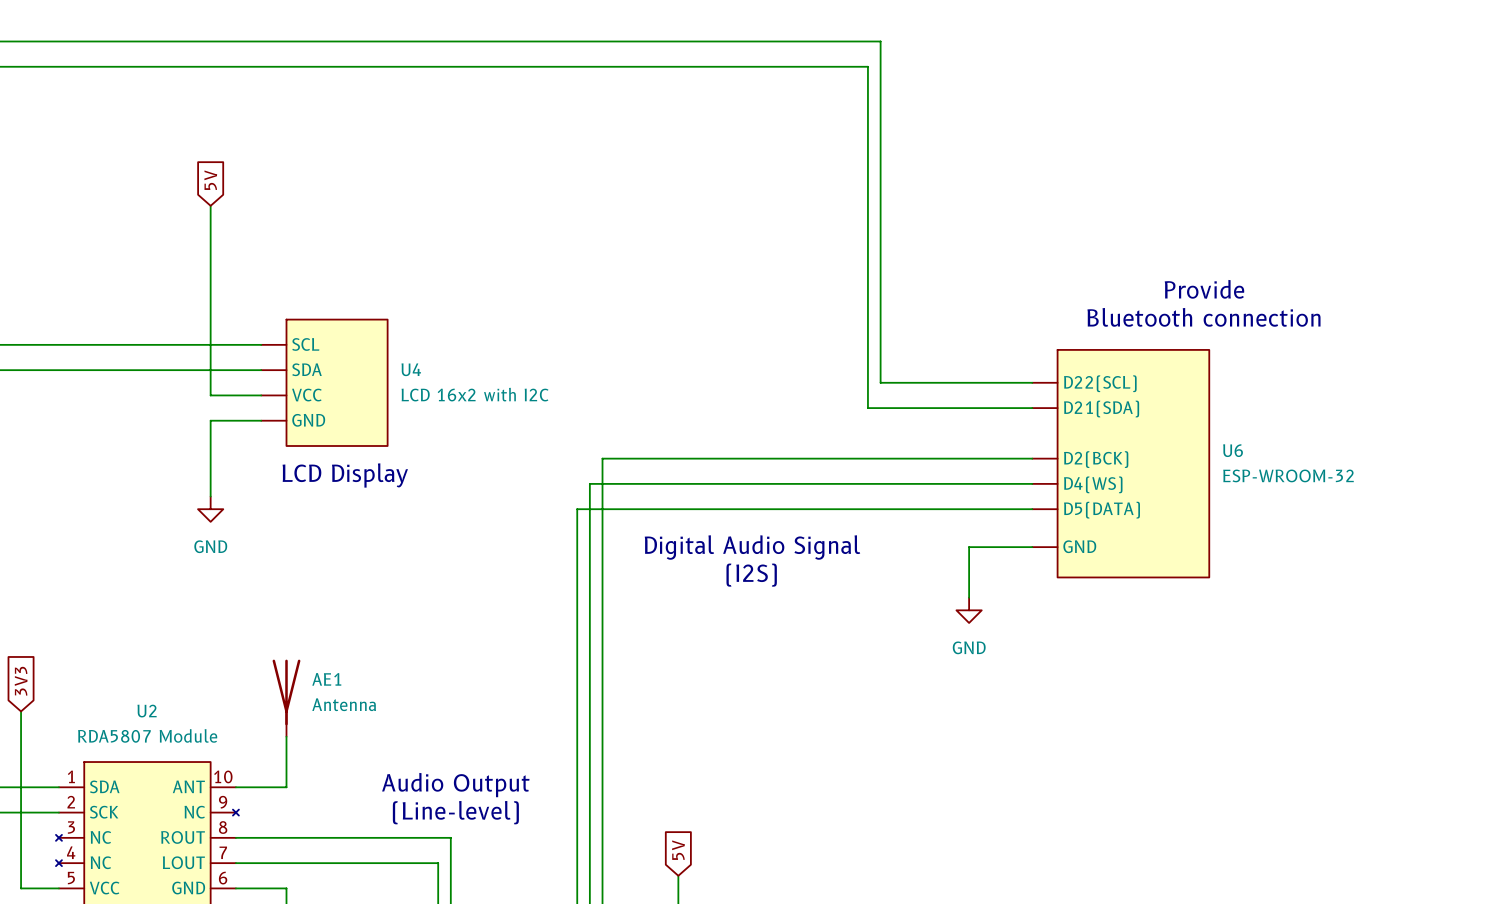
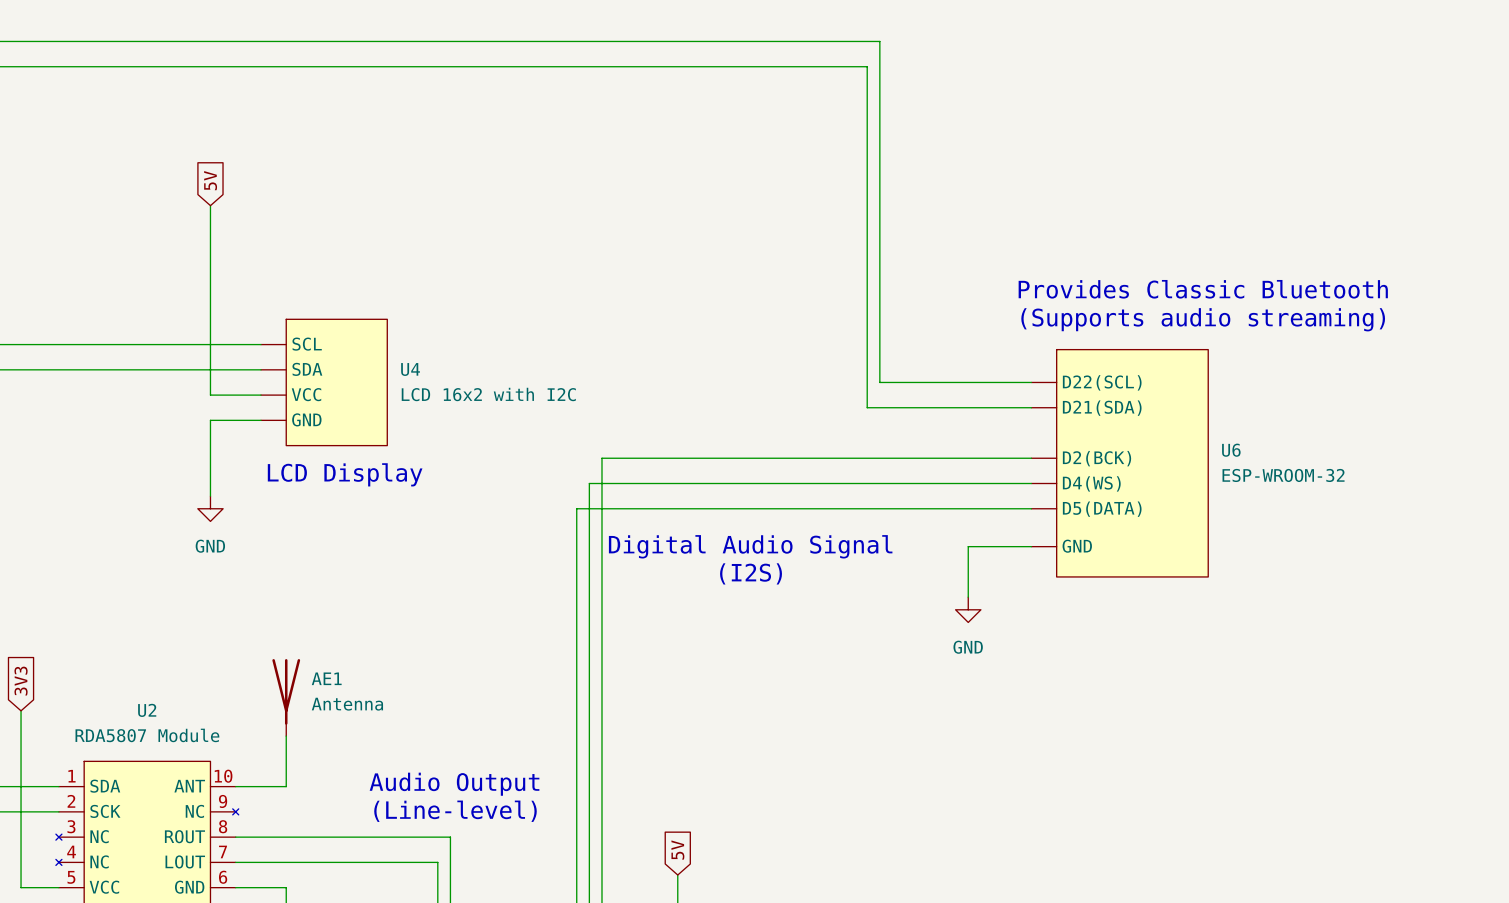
text: Provide (1204, 289) -> Provides Classic Bluetooth (1203, 289)
text: Bluetooth connection (1203, 317) -> (Supports audio streaming) (1203, 319)

